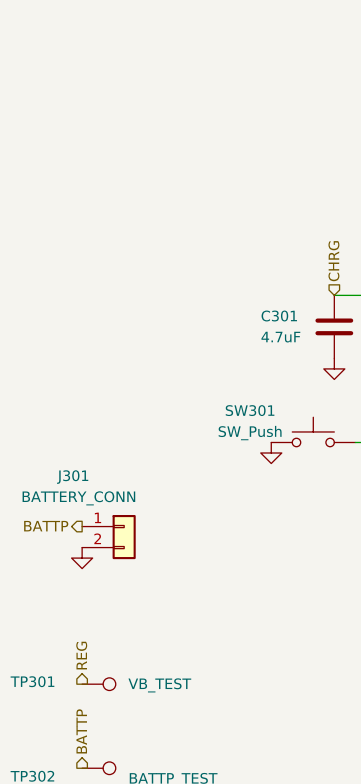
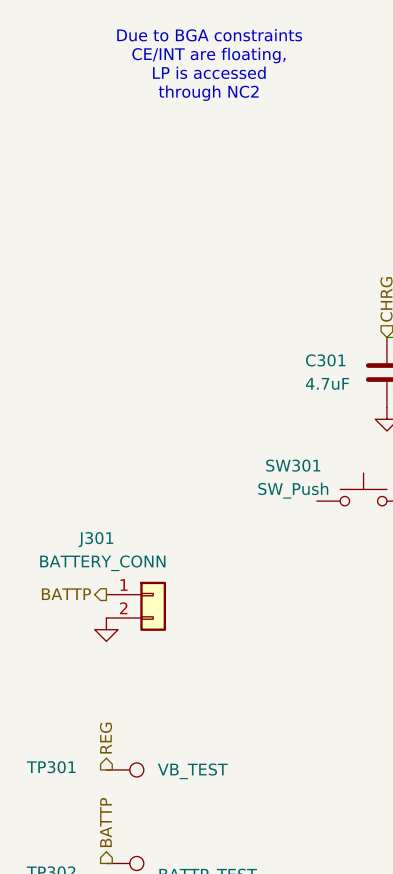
text: none -> Due to BGA constraints (209, 35)
text: none -> CE/INT are floating, (208, 55)
text: none -> LP is accessed (209, 72)
text: none -> through NC2 (208, 93)
power symbol: (271, 453) -> none

